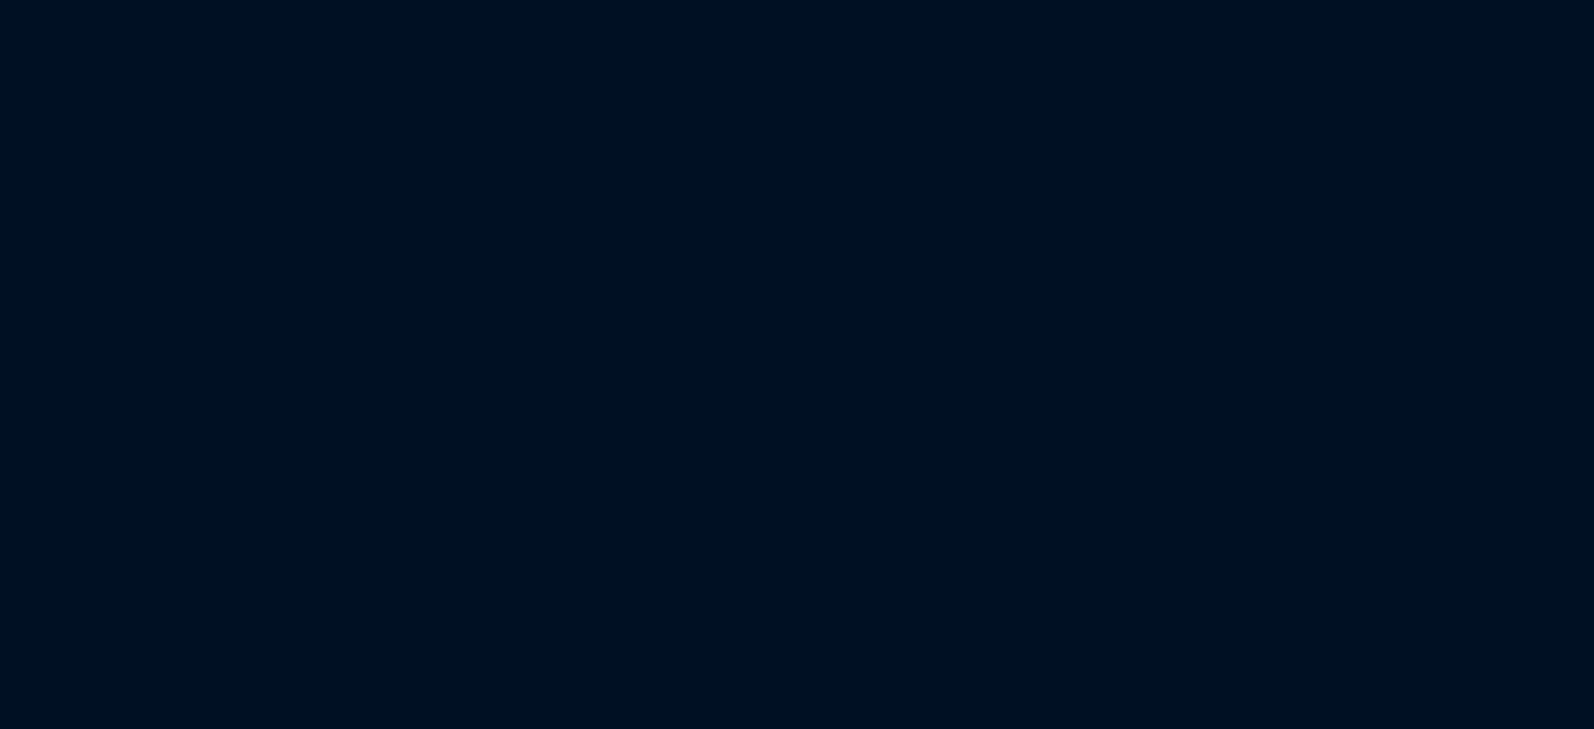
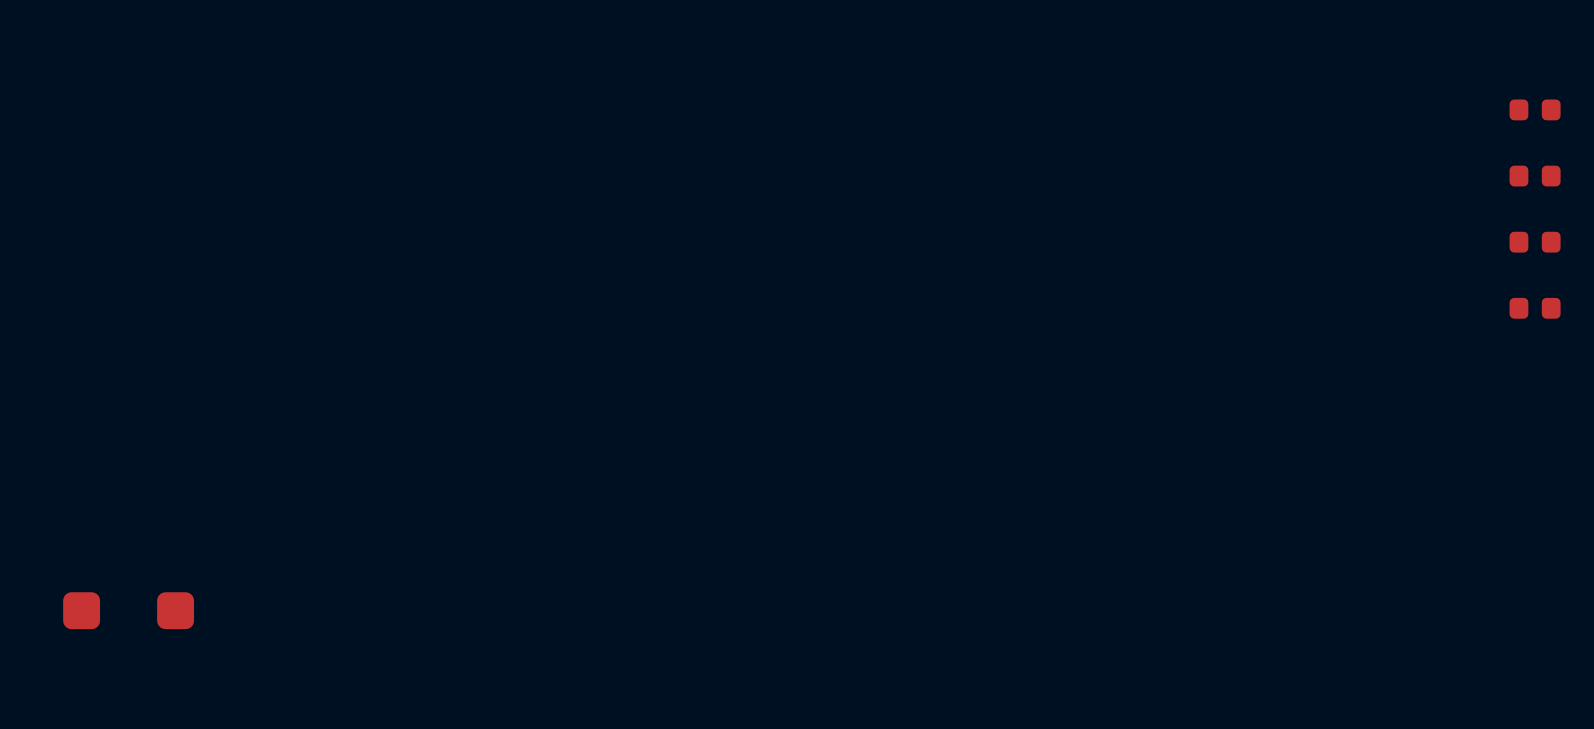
part: none -> (1535, 109)
part: none -> (1535, 176)
part: none -> (1535, 242)
part: none -> (1535, 308)
part: none -> (128, 610)

